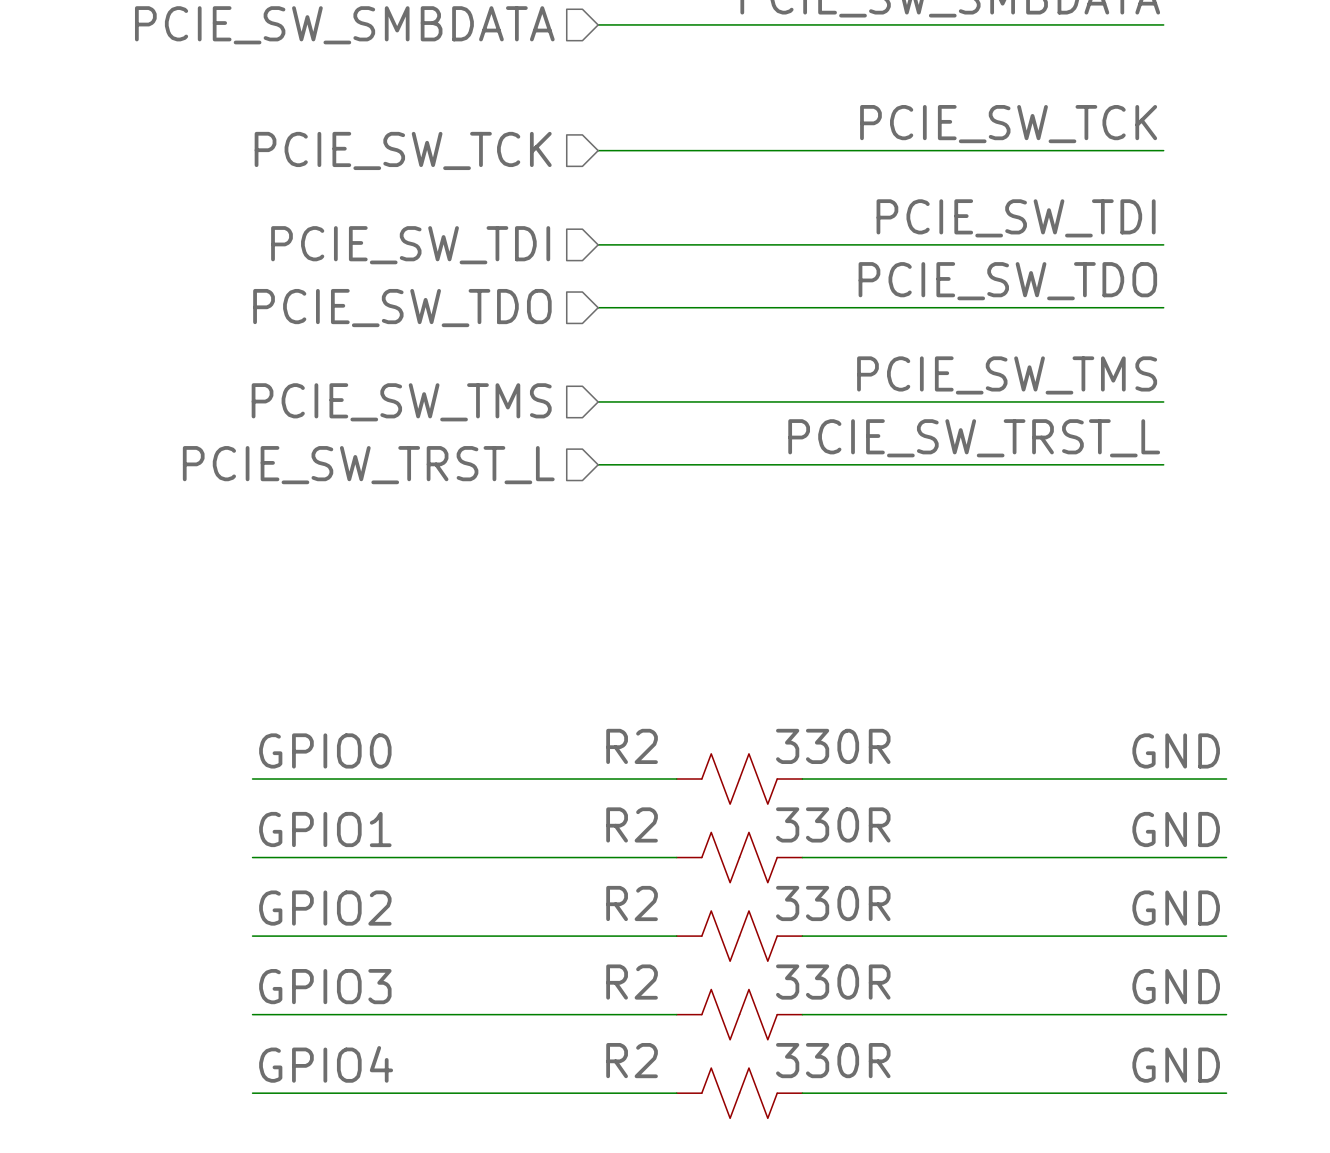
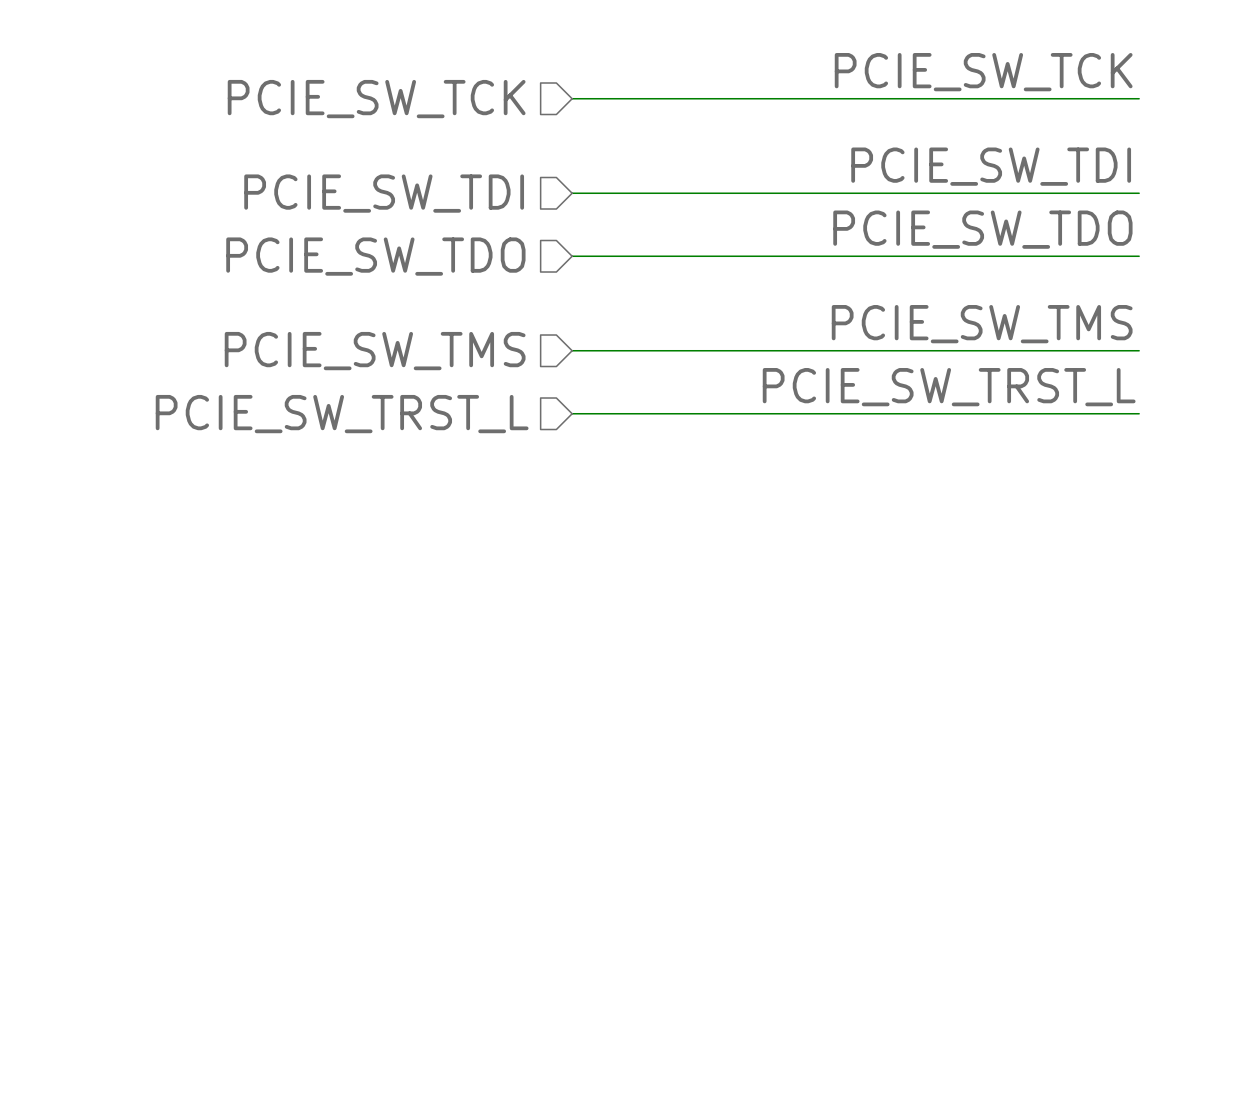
label: GPIO0 (325, 750) -> none
label: GND (1176, 750) -> none
wire: (252, 779) (676, 779) -> none
R2: 330R (739, 779) -> none
wire: (802, 779) (1226, 779) -> none
label: GPIO1 (325, 829) -> none
label: GND (1176, 829) -> none
wire: (252, 857) (676, 857) -> none
R2: 330R (739, 857) -> none
wire: (802, 857) (1226, 857) -> none
label: GPIO2 (325, 908) -> none
label: GND (1176, 908) -> none
wire: (252, 936) (676, 936) -> none
R2: 330R (739, 936) -> none
wire: (802, 936) (1226, 936) -> none
label: GPIO3 (325, 986) -> none
label: GND (1176, 986) -> none
wire: (252, 1014) (676, 1014) -> none
R2: 330R (739, 1014) -> none
wire: (802, 1014) (1226, 1014) -> none
label: GPIO4 (326, 1064) -> none
label: GND (1176, 1065) -> none
wire: (252, 1093) (676, 1093) -> none
R2: 330R (739, 1093) -> none
wire: (802, 1093) (1226, 1093) -> none

